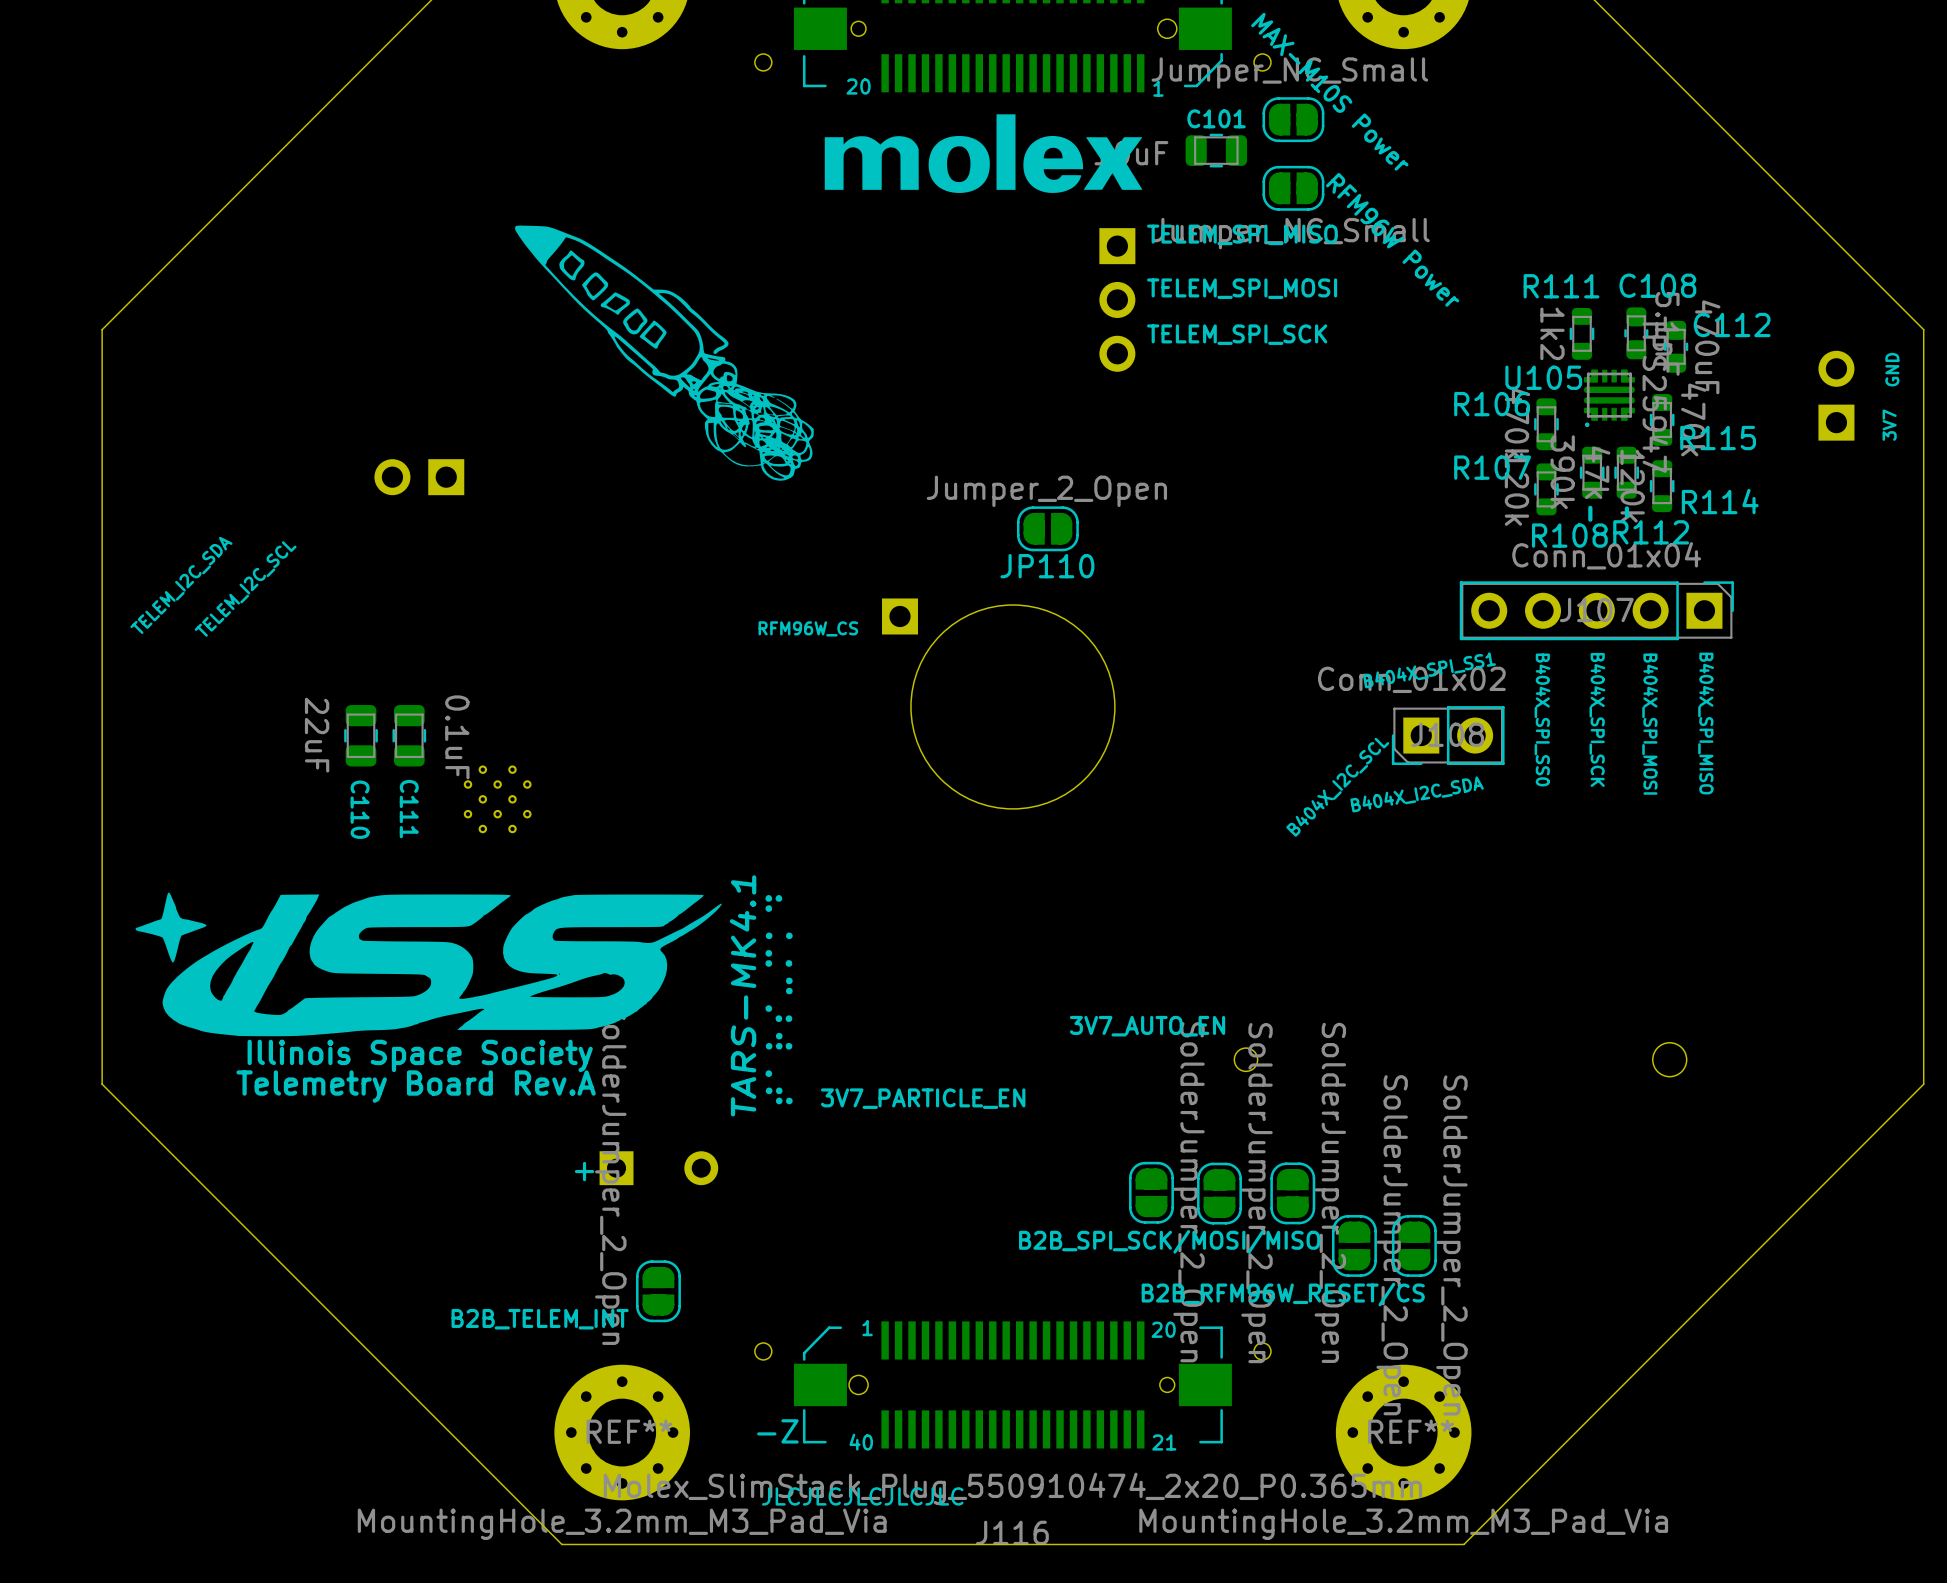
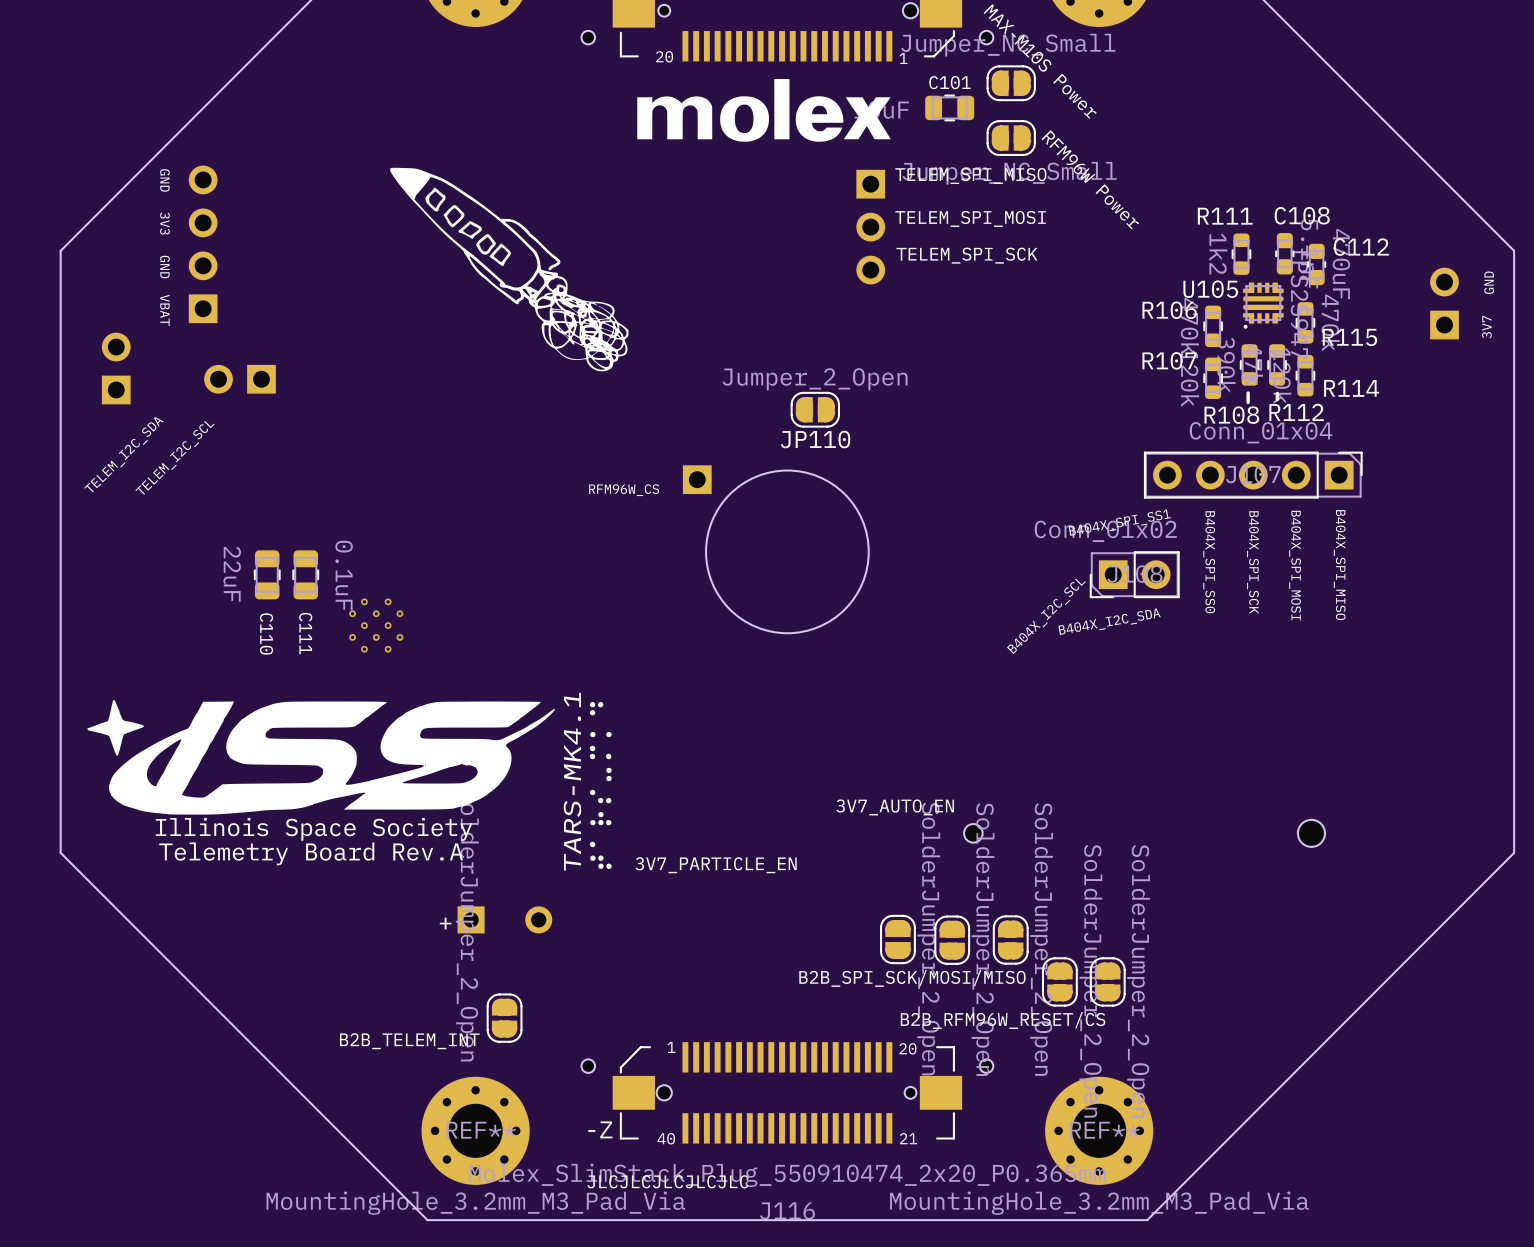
text: none -> GND (164, 180)
text: none -> 3V3 (164, 223)
part: none -> (203, 244)
text: none -> GND (164, 267)
text: none -> VBAT (164, 310)
part: none -> (116, 368)
part position: (419, 477) -> (240, 379)

